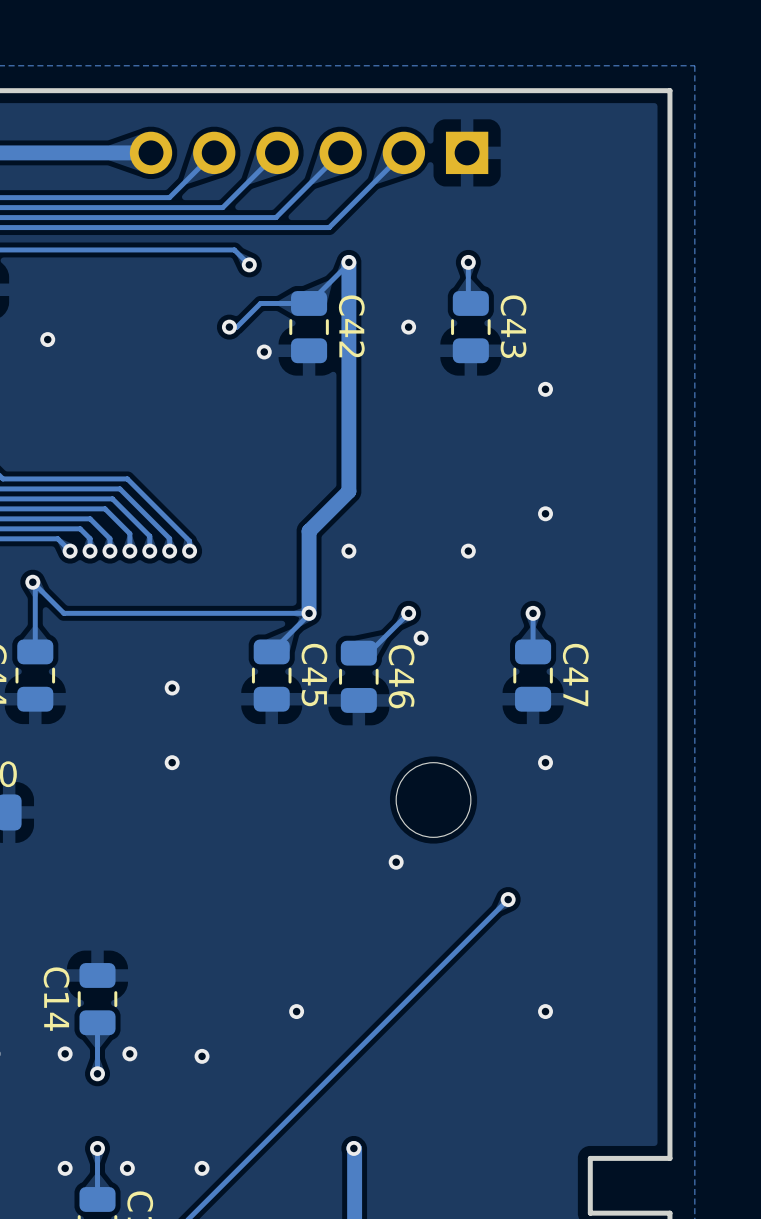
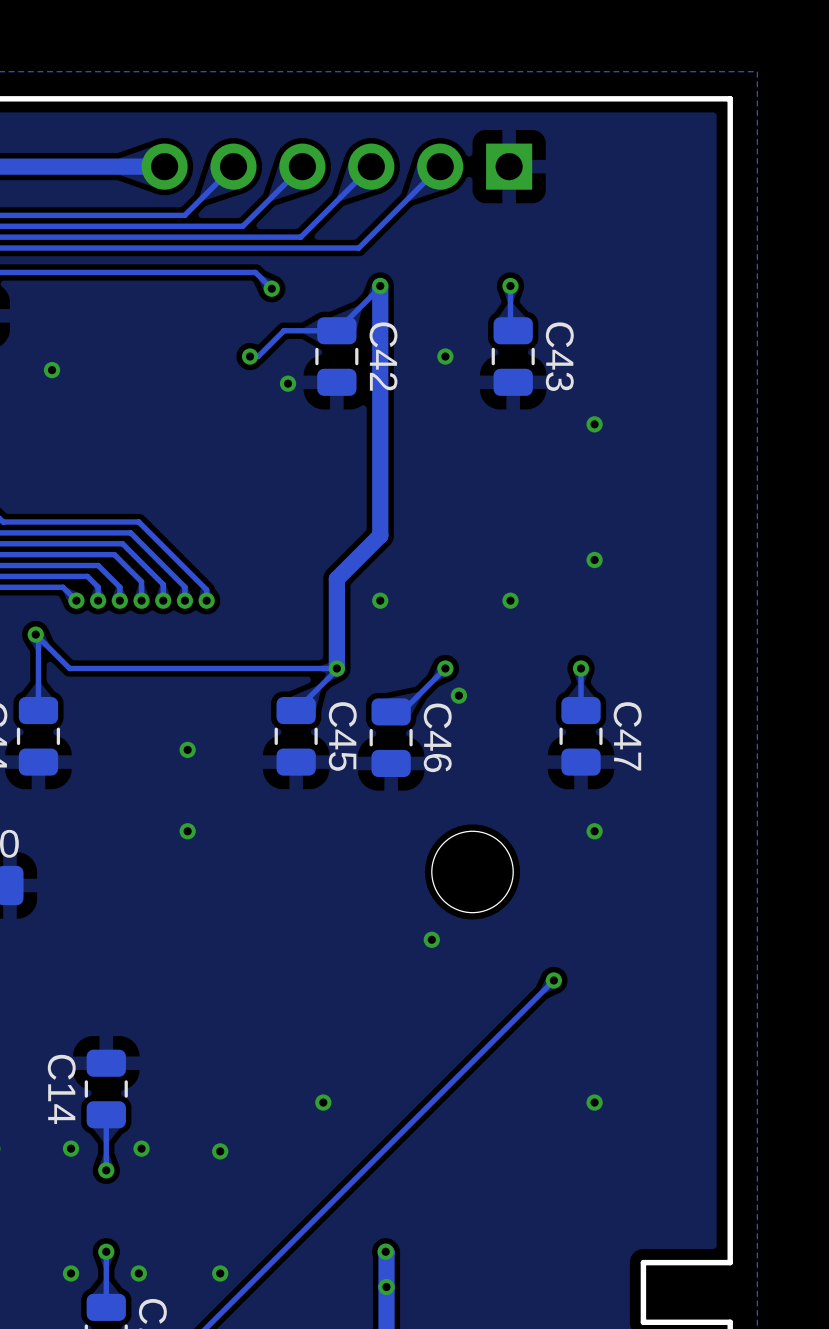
via: none -> (386, 1287)

